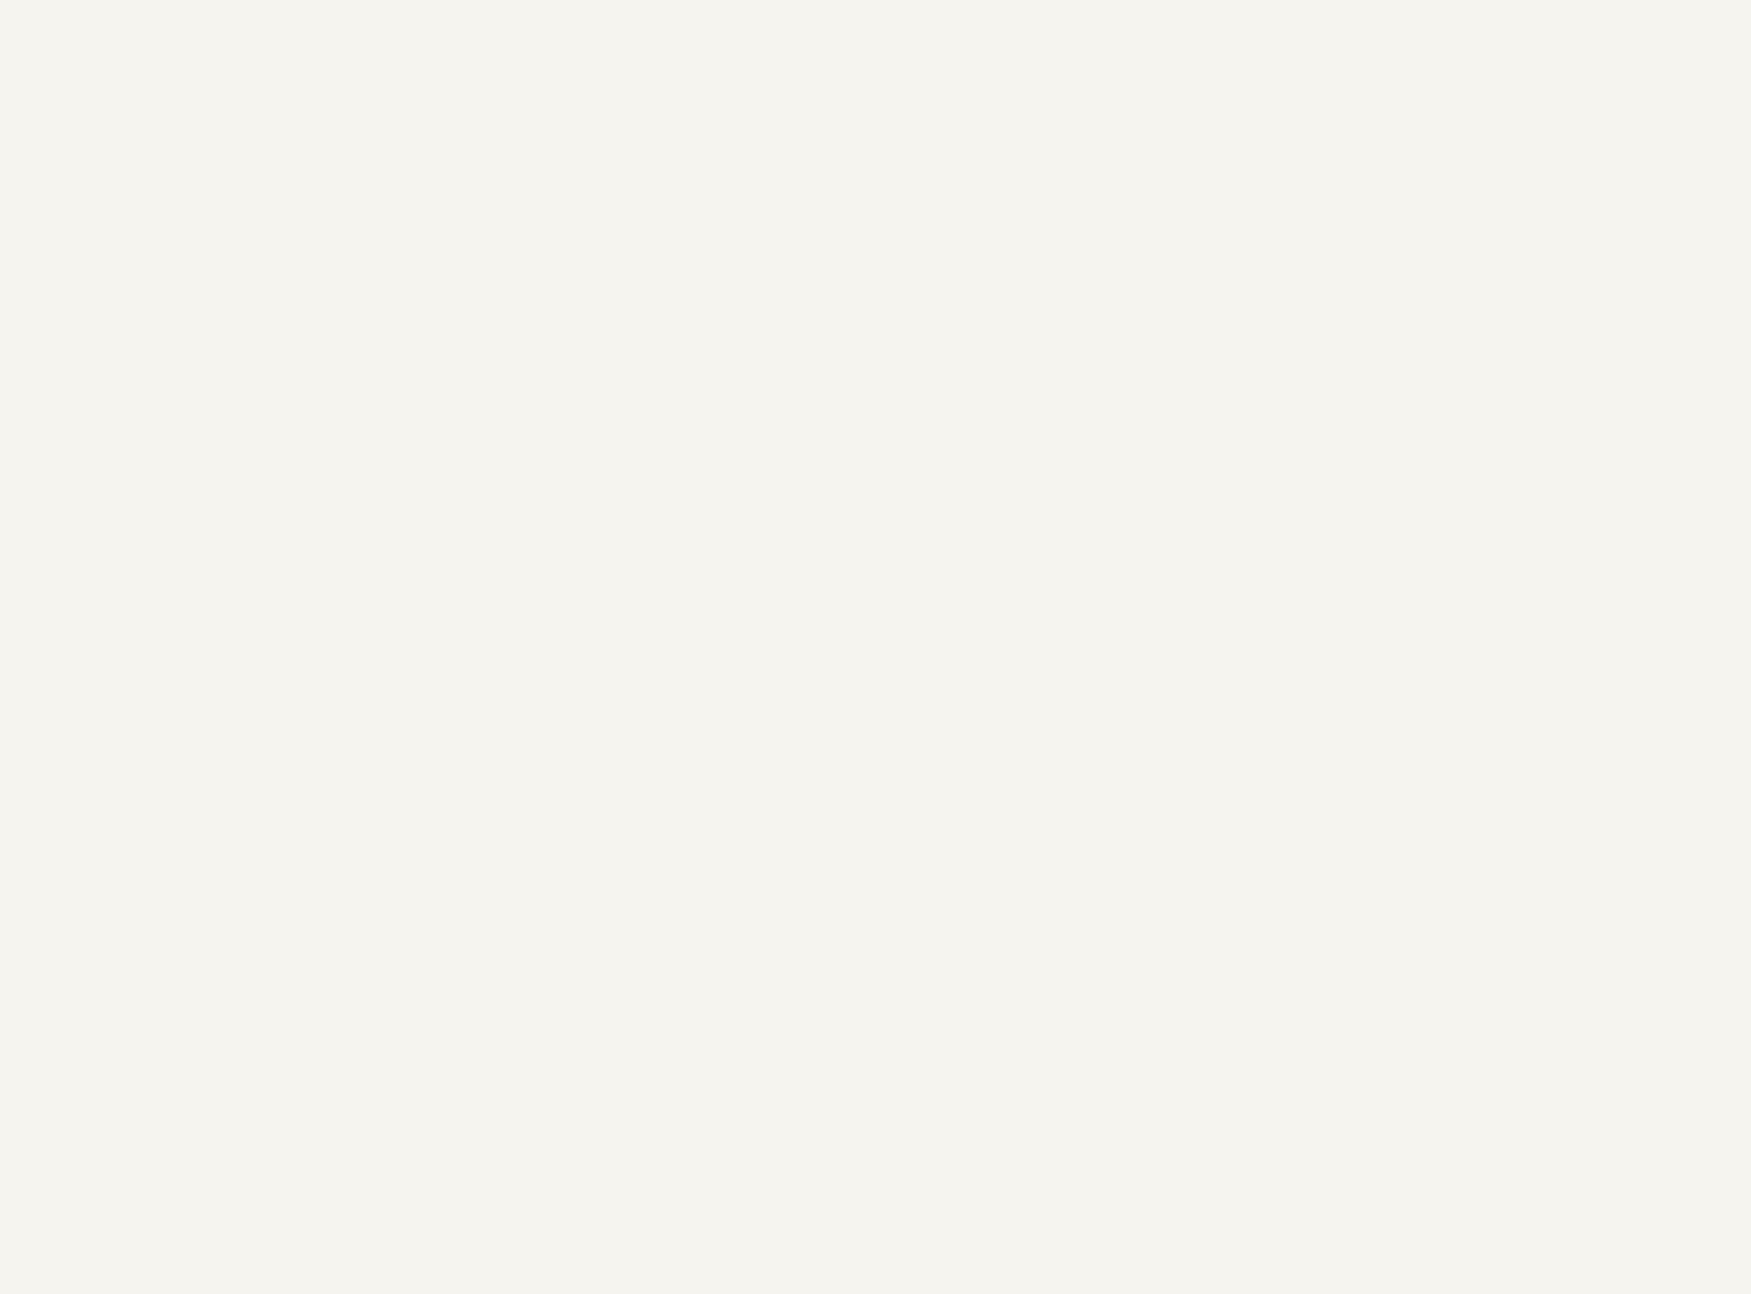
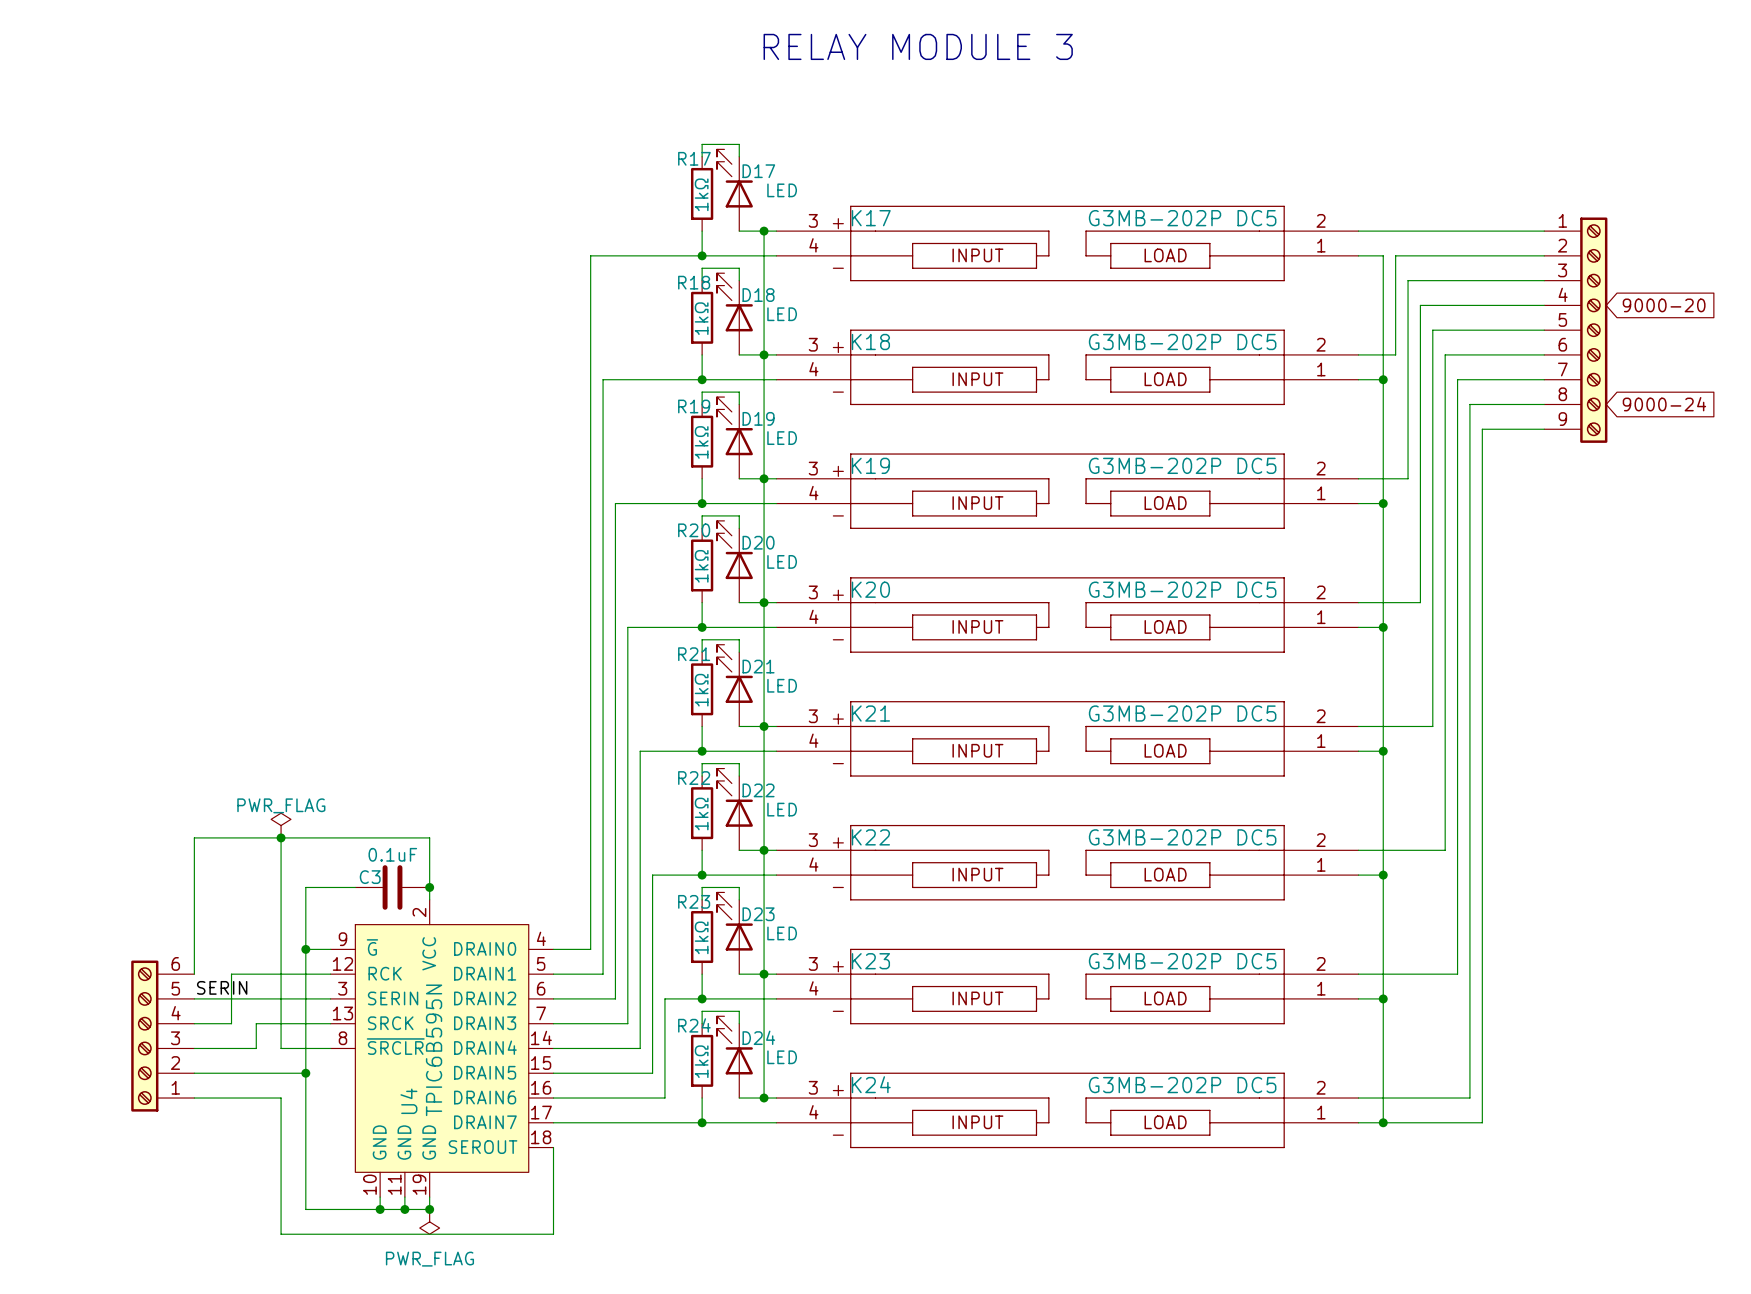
text: none -> RELAY MODULE 3 (918, 46)
wire: none -> (702, 156) (702, 144) (739, 144) (739, 156)
D17: none -> LED (734, 190)
R17: none -> 1kΩ (702, 193)
wire: none -> (702, 231) (702, 255)
wire: none -> (739, 231) (776, 231)
wire: none -> (764, 231) (764, 1098)
junction: none -> (764, 231)
wire: none -> (1358, 231) (1544, 231)
K17: none -> G3MB-202P DC5 (1067, 243)
junction: none -> (702, 255)
wire: none -> (776, 255) (590, 255) (590, 949) (553, 949)
wire: none -> (1358, 255) (1383, 255) (1383, 1122)
wire: none -> (1544, 255) (1395, 255) (1395, 354) (1358, 354)
wire: none -> (702, 280) (702, 268) (739, 268) (739, 280)
wire: none -> (1544, 280) (1408, 280) (1408, 478) (1358, 478)
wire: none -> (1544, 305) (1420, 305) (1420, 602) (1358, 602)
global label: none -> 9000-20 (1664, 305)
D18: none -> LED (734, 314)
R18: none -> 1kΩ (702, 317)
wire: none -> (1544, 330) (1432, 330) (1432, 726) (1358, 726)
part: none -> (1575, 330)
wire: none -> (702, 354) (702, 379)
wire: none -> (739, 354) (776, 354)
junction: none -> (764, 354)
wire: none -> (1544, 354) (1445, 354) (1445, 850) (1358, 850)
K18: none -> G3MB-202P DC5 (1067, 367)
junction: none -> (702, 379)
wire: none -> (776, 379) (603, 379) (603, 974) (553, 974)
wire: none -> (1358, 379) (1383, 379)
junction: none -> (1383, 379)
wire: none -> (1544, 379) (1457, 379) (1457, 974) (1358, 974)
wire: none -> (702, 404) (702, 392) (739, 392) (739, 404)
wire: none -> (1544, 404) (1469, 404) (1469, 1098) (1358, 1098)
global label: none -> 9000-24 (1664, 404)
wire: none -> (1544, 429) (1482, 429) (1482, 1122) (1358, 1122)
D19: none -> LED (734, 437)
R19: none -> 1kΩ (702, 441)
wire: none -> (702, 478) (702, 503)
wire: none -> (739, 478) (776, 478)
junction: none -> (764, 478)
K19: none -> G3MB-202P DC5 (1067, 491)
junction: none -> (702, 503)
wire: none -> (776, 503) (615, 503) (615, 998) (553, 998)
wire: none -> (1358, 503) (1383, 503)
junction: none -> (1383, 503)
wire: none -> (702, 528) (702, 515) (739, 515) (739, 528)
D20: none -> LED (734, 561)
R20: none -> 1kΩ (702, 565)
wire: none -> (702, 602) (702, 627)
wire: none -> (739, 602) (776, 602)
junction: none -> (764, 602)
K20: none -> G3MB-202P DC5 (1067, 615)
junction: none -> (702, 627)
wire: none -> (776, 627) (627, 627) (627, 1023) (553, 1023)
wire: none -> (1358, 627) (1383, 627)
junction: none -> (1383, 627)
wire: none -> (702, 652) (702, 639) (739, 639) (739, 652)
D21: none -> LED (734, 685)
R21: none -> 1kΩ (702, 689)
wire: none -> (702, 726) (702, 751)
wire: none -> (739, 726) (776, 726)
junction: none -> (764, 726)
K21: none -> G3MB-202P DC5 (1067, 738)
junction: none -> (702, 751)
wire: none -> (776, 751) (640, 751) (640, 1048) (553, 1048)
wire: none -> (1358, 751) (1383, 751)
junction: none -> (1383, 751)
wire: none -> (702, 776) (702, 763) (739, 763) (739, 776)
D22: none -> LED (734, 809)
R22: none -> 1kΩ (702, 813)
power symbol: none -> PWR_FLAG (281, 825)
wire: none -> (281, 837) (281, 1048) (330, 1048)
junction: none -> (281, 837)
wire: none -> (702, 850) (702, 875)
wire: none -> (739, 850) (776, 850)
junction: none -> (764, 850)
K22: none -> G3MB-202P DC5 (1067, 862)
junction: none -> (702, 875)
wire: none -> (776, 875) (652, 875) (652, 1073) (553, 1073)
wire: none -> (1358, 875) (1383, 875)
junction: none -> (1383, 875)
wire: none -> (355, 887) (305, 887) (305, 1209) (429, 1209) (429, 1197)
C3: none -> 0.1uF (392, 887)
junction: none -> (429, 887)
wire: none -> (429, 899) (429, 837) (194, 837) (194, 974)
wire: none -> (702, 899) (702, 887) (739, 887) (739, 899)
D23: none -> LED (734, 933)
R23: none -> 1kΩ (702, 937)
wire: none -> (305, 949) (330, 949)
junction: none -> (305, 949)
wire: none -> (330, 974) (231, 974) (231, 1023) (194, 1023)
wire: none -> (702, 974) (702, 998)
wire: none -> (739, 974) (776, 974)
junction: none -> (764, 974)
K23: none -> G3MB-202P DC5 (1067, 986)
label: none -> SERIN (222, 987)
wire: none -> (194, 998) (330, 998)
junction: none -> (702, 998)
wire: none -> (776, 998) (664, 998) (664, 1098) (553, 1098)
wire: none -> (1358, 998) (1383, 998)
junction: none -> (1383, 998)
wire: none -> (330, 1023) (256, 1023) (256, 1048) (194, 1048)
wire: none -> (702, 1023) (702, 1011) (739, 1011) (739, 1023)
part: none -> (162, 1036)
U4: none -> TPIC6B595N (442, 1048)
D24: none -> LED (734, 1057)
R24: none -> 1kΩ (702, 1060)
wire: none -> (194, 1073) (305, 1073)
junction: none -> (305, 1073)
wire: none -> (194, 1098) (281, 1098) (281, 1234) (553, 1234) (553, 1147)
wire: none -> (702, 1098) (702, 1122)
wire: none -> (739, 1098) (776, 1098)
junction: none -> (764, 1098)
K24: none -> G3MB-202P DC5 (1067, 1110)
wire: none -> (553, 1122) (776, 1122)
junction: none -> (702, 1122)
junction: none -> (1383, 1122)
wire: none -> (380, 1197) (380, 1209)
wire: none -> (404, 1197) (404, 1209)
junction: none -> (380, 1209)
junction: none -> (404, 1209)
junction: none -> (429, 1209)
power symbol: none -> PWR_FLAG (429, 1221)

